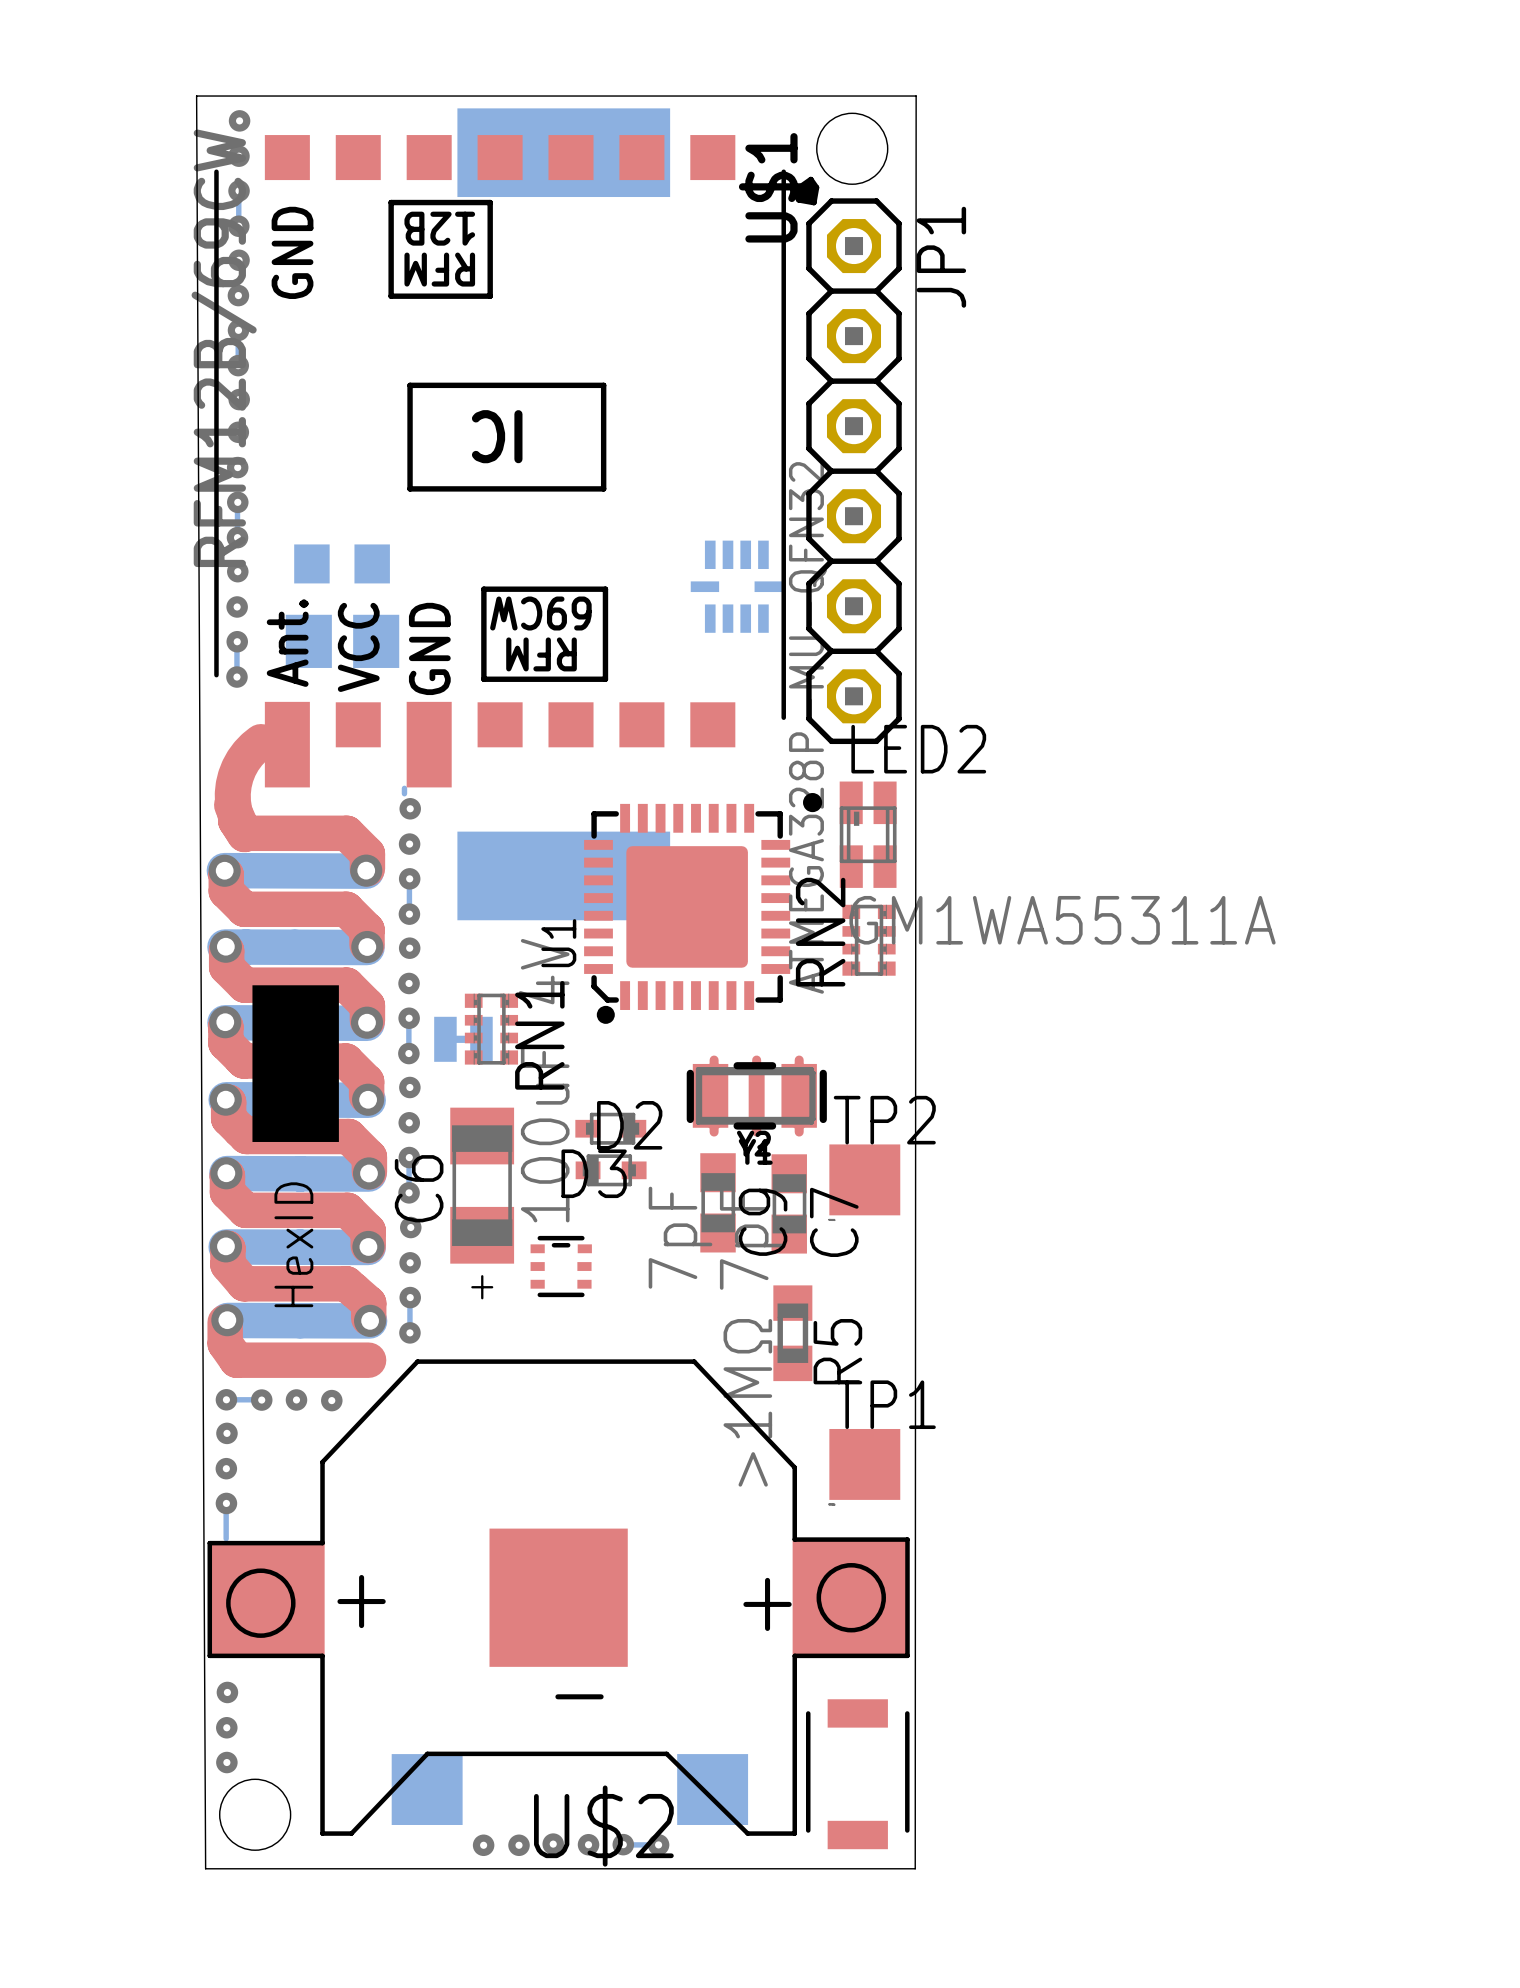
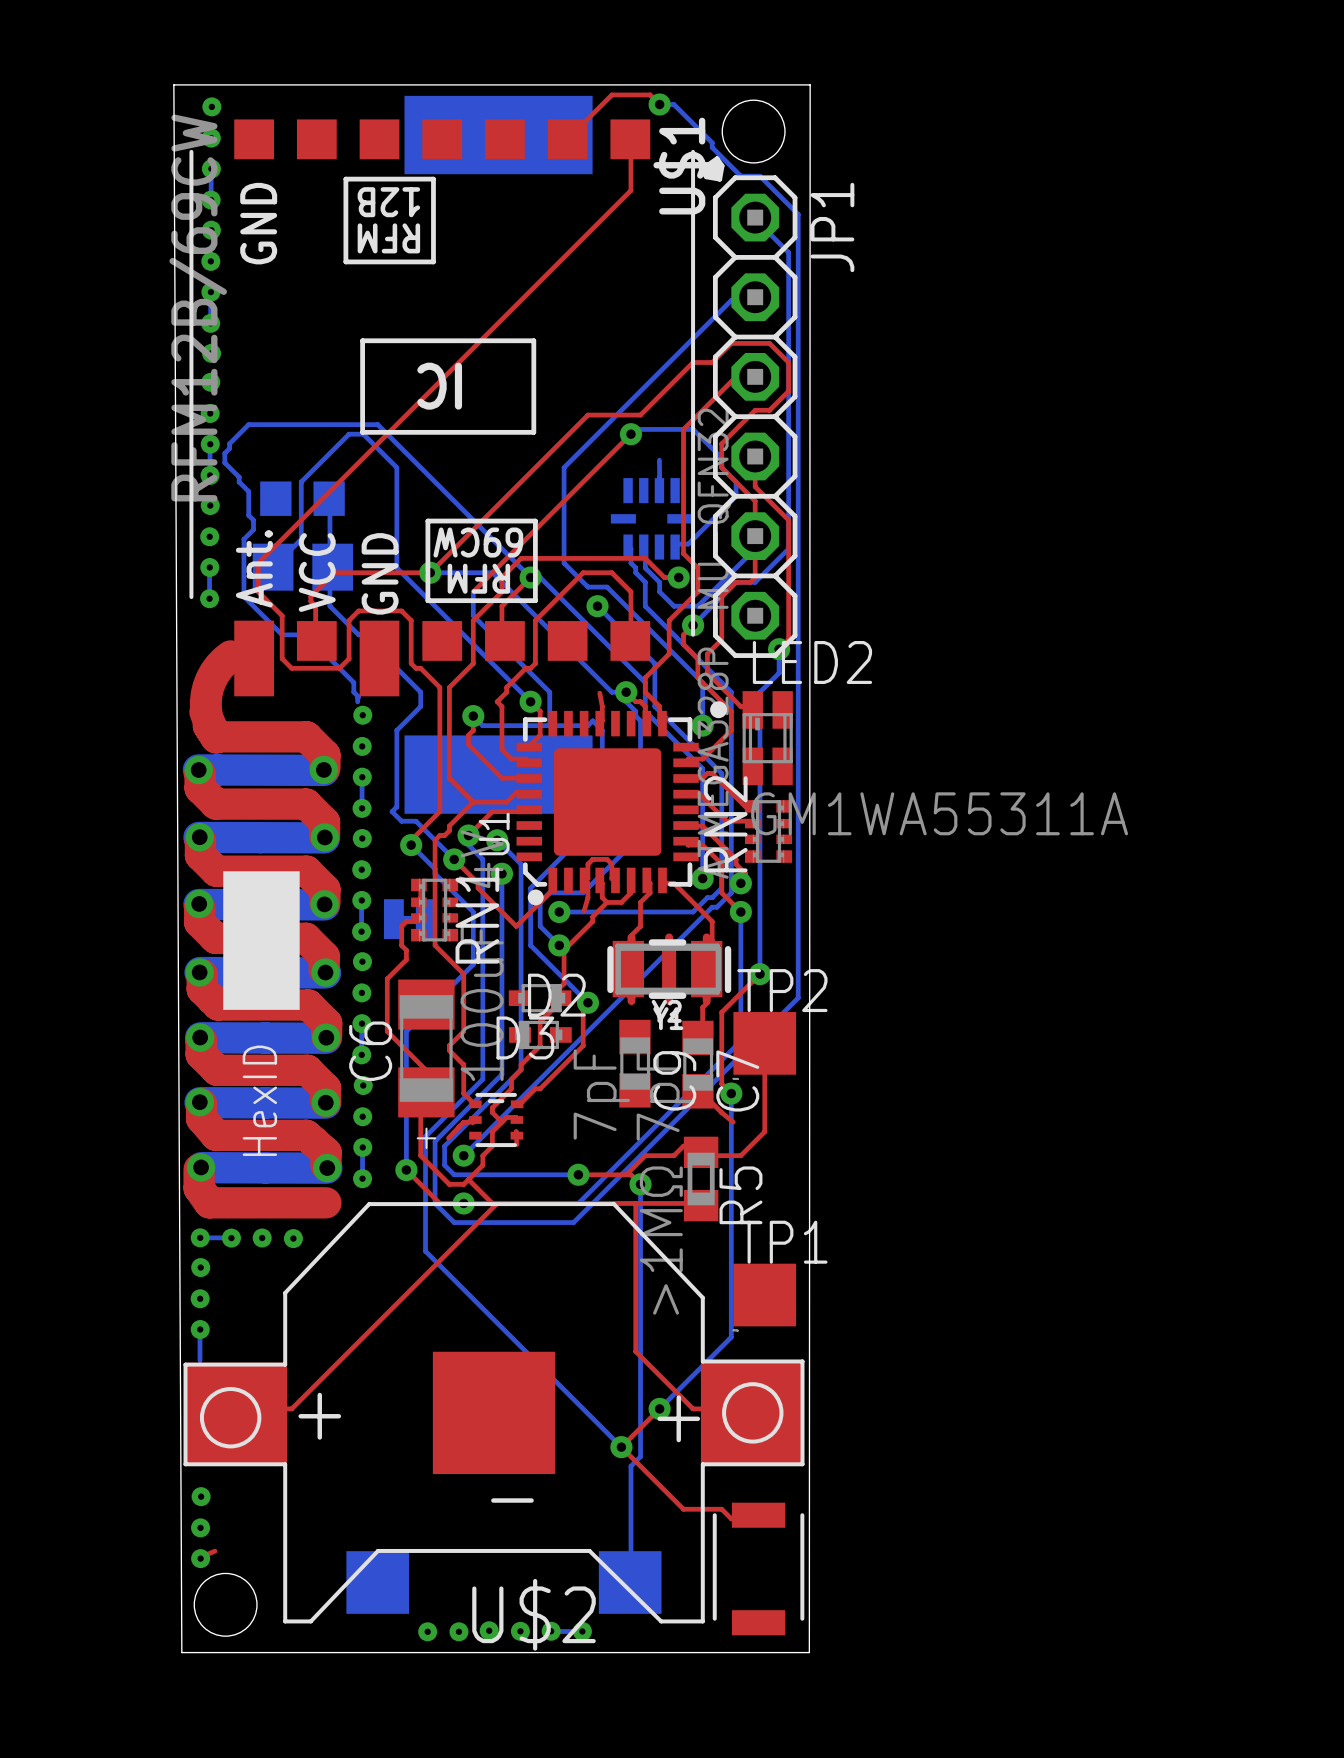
bottom track: none -> (659, 104) (673, 104) (712, 142) (712, 147) (740, 176) (759, 176) (798, 214) (798, 997) (573, 1222) (454, 1222) (435, 1203) (435, 1141) (501, 1074) (501, 873)
top track: none -> (659, 104) (650, 94) (611, 94) (567, 139)
via: none -> (659, 104)
top track: none -> (630, 139) (630, 190) (258, 563) (258, 591) (282, 615) (282, 658) (291, 668) (339, 668) (349, 658) (349, 620) (358, 610) (401, 610) (411, 620) (411, 663) (415, 668) (420, 668) (439, 687) (439, 811) (411, 840) (411, 845)
bottom track: none -> (755, 217) (788, 252) (788, 548) (755, 582) (736, 582) (693, 625)
bottom track: none -> (755, 297) (755, 300) (731, 300) (564, 467) (564, 563) (587, 587) (607, 587) (702, 682) (702, 725)
top track: none -> (755, 376) (736, 376) (683, 429) (683, 553) (697, 567) (697, 591) (669, 620) (669, 653) (645, 677) (645, 692) (659, 706) (659, 720) (662, 723)
bottom track: none -> (630, 434) (635, 429) (693, 429) (721, 458) (721, 467) (736, 481) (736, 496) (688, 544) (678, 544) (675, 547)
top track: none -> (630, 434) (473, 591)
via: none -> (630, 434)
top track: none -> (755, 456) (755, 486) (788, 520) (788, 639) (779, 649)
bottom track: none -> (659, 460) (659, 490)
bottom track: none -> (329, 498) (329, 563) (332, 567) (329, 567) (329, 606) (358, 634) (363, 634) (420, 692) (420, 706) (396, 730) (396, 806) (392, 811) (401, 821) (415, 821) (454, 859)
bottom track: none -> (755, 536) (755, 548) (697, 606) (673, 606) (659, 591) (659, 582) (645, 567) (643, 547)
bottom track: none -> (628, 547) (630, 548) (630, 563) (635, 567) (635, 572) (645, 582) (645, 606) (731, 692) (731, 892) (716, 907) (712, 907) (463, 1155)
bottom track: none -> (273, 567) (301, 539) (301, 481) (349, 434) (363, 434) (396, 467) (396, 567) (530, 701)
bottom track: none -> (430, 572) (492, 572) (611, 692) (626, 692) (626, 701) (635, 711) (635, 716) (640, 720) (640, 835) (583, 892) (549, 892) (540, 902) (540, 926) (559, 945)
via: none -> (430, 572)
top track: none -> (530, 577) (501, 606) (501, 639) (504, 640)
via: none -> (530, 577)
top track: none -> (678, 577) (664, 577) (645, 558) (521, 558) (501, 577) (501, 591) (473, 620) (473, 663) (449, 687) (449, 778) (473, 802)
via: none -> (678, 577)
bottom track: none -> (473, 591) (473, 615) (549, 692) (549, 725)
bottom track: none -> (597, 606) (654, 663) (654, 706) (721, 773) (721, 888) (712, 897) (707, 897) (693, 911) (559, 911)
via: none -> (597, 606)
top track: none -> (693, 625) (683, 634) (683, 644) (697, 658) (697, 677) (731, 711) (731, 730) (702, 759) (688, 759) (686, 762)
via: none -> (693, 625)
top track: none -> (316, 640) (315, 606) (310, 601) (310, 596) (334, 572) (430, 572) (587, 415) (640, 415) (693, 362) (712, 362) (731, 343) (769, 343) (788, 362) (788, 391) (769, 410) (755, 410) (721, 443) (721, 467) (755, 501) (755, 577) (750, 582) (736, 582) (721, 596) (721, 639) (707, 653) (707, 673) (740, 706) (750, 706) (752, 709)
top track: none -> (630, 640) (630, 591) (611, 572) (583, 572) (535, 620) (535, 663) (530, 668) (525, 668) (506, 687) (506, 692) (497, 701) (501, 706) (501, 749) (511, 759) (525, 759) (529, 762)
bottom track: none -> (779, 649) (779, 673) (759, 692) (759, 974)
via: none -> (779, 649)
top track: none -> (626, 692) (635, 701) (640, 701) (645, 706) (646, 723)
via: none -> (626, 692)
top track: none -> (599, 693) (602, 720) (599, 723)
bottom track: none -> (357, 697) (353, 692) (353, 682) (306, 634) (282, 634) (243, 596) (243, 539) (253, 529) (253, 520) (248, 515) (248, 491) (239, 481) (239, 477) (224, 462) (224, 453) (229, 448) (229, 443) (248, 424) (377, 424) (530, 577) (540, 577) (645, 682) (645, 711) (702, 768) (702, 878)
top track: none -> (530, 701) (540, 711) (540, 735) (529, 747)
via: none -> (530, 701)
bottom track: none -> (473, 716) (482, 725) (587, 725) (592, 720) (602, 730) (602, 806) (607, 811) (530, 888) (530, 945) (587, 1002)
top track: none -> (473, 716) (473, 730) (468, 735) (468, 744) (501, 778) (529, 778)
via: none -> (473, 716)
via: none -> (702, 725)
top track: none -> (686, 778) (702, 778) (707, 773) (712, 773) (745, 806) (752, 806)
top track: none -> (529, 794) (516, 792) (506, 802) (473, 802)
top track: none -> (686, 794) (697, 792) (726, 821) (750, 821) (752, 823)
top track: none -> (473, 802) (449, 825) (449, 830) (444, 835) (439, 835) (435, 840) (435, 945) (463, 974) (463, 1031) (449, 1045) (449, 1050) (463, 1064) (463, 1093) (475, 1104)
top track: none -> (529, 809) (525, 811) (492, 811) (468, 835)
top track: none -> (686, 825) (702, 825) (736, 859) (736, 864) (745, 873) (740, 878) (740, 883)
bottom track: none -> (468, 835) (468, 845) (482, 859) (482, 1079) (425, 1136) (425, 1251) (621, 1447)
via: none -> (468, 835)
bottom track: none -> (497, 840) (521, 864) (521, 1069) (444, 1146) (444, 1165) (454, 1174) (578, 1174)
via: none -> (497, 840)
top track: none -> (686, 841) (688, 845) (702, 845) (721, 864) (721, 892) (740, 911)
bottom track: none -> (411, 845) (435, 868) (435, 873) (473, 911) (473, 964) (406, 1031) (406, 1170)
via: none -> (411, 845)
top track: none -> (454, 859) (478, 883) (478, 888) (516, 926) (554, 888) (552, 880)
via: none -> (454, 859)
via: none -> (501, 873)
via: none -> (702, 878)
top track: none -> (599, 880) (602, 883) (602, 897) (607, 902)
top track: none -> (615, 880) (611, 878) (611, 864) (607, 859) (592, 859) (587, 864) (587, 878) (584, 880) (587, 883) (587, 897) (584, 910)
top track: none -> (631, 880) (630, 892) (621, 902) (607, 902)
top track: none -> (646, 880) (650, 883) (650, 892) (640, 902) (640, 926) (630, 935) (631, 969)
top track: none -> (662, 880) (664, 883) (673, 883) (712, 921) (712, 940) (707, 945) (706, 969)
via: none -> (740, 883)
top track: none -> (418, 885) (420, 888) (418, 902) (420, 902) (420, 916) (415, 921) (406, 921) (401, 926) (401, 945) (406, 950) (406, 959) (387, 978) (387, 1031) (425, 1069) (426, 1092) (420, 1098) (420, 1155) (449, 1184) (463, 1184) (482, 1165) (482, 1155) (492, 1146) (492, 1131) (506, 1117) (516, 1117) (516, 1119)
top track: none -> (607, 902) (592, 916) (592, 921) (564, 950)
via: none -> (559, 911)
bottom track: none -> (740, 911) (740, 1041) (578, 1203) (463, 1203)
via: none -> (740, 911)
via: none -> (559, 945)
top track: none -> (564, 950) (564, 983) (559, 988) (560, 998) (559, 1002) (540, 1021) (540, 1045) (521, 1064) (521, 1069) (511, 1079) (511, 1088) (492, 1107) (492, 1112) (501, 1122)
top track: none -> (759, 974) (721, 1012) (721, 1084) (731, 1093)
via: none -> (759, 974)
top track: none -> (706, 1001) (702, 1007) (702, 1036) (697, 1038)
top track: none -> (587, 1002) (583, 1007) (583, 1045) (540, 1088) (535, 1088) (521, 1103) (517, 1104)
via: none -> (587, 1002)
top track: none -> (764, 1043) (764, 1131) (740, 1155) (702, 1155) (693, 1146) (683, 1146) (673, 1155) (645, 1155) (626, 1174)
top track: none -> (697, 1091) (733, 1122)
bottom track: none -> (731, 1093) (731, 1337) (659, 1408)
via: none -> (731, 1093)
top track: none -> (475, 1119) (473, 1122) (463, 1122) (448, 1138)
top track: none -> (516, 1135) (516, 1131) (516, 1144)
via: none -> (463, 1155)
top track: none -> (406, 1170) (439, 1203) (463, 1203)
via: none -> (406, 1170)
top track: none -> (578, 1174) (630, 1174) (640, 1184)
via: none -> (578, 1174)
top track: none -> (468, 1179) (492, 1203) (697, 1203) (701, 1205)
bottom track: none -> (640, 1184) (640, 1456) (630, 1466) (630, 1582)
via: none -> (640, 1184)
via: none -> (463, 1203)
top track: none -> (497, 1203) (291, 1408) (239, 1408) (236, 1412)
top track: none -> (635, 1203) (635, 1351) (693, 1408) (750, 1408) (751, 1412)
top track: none -> (659, 1408) (621, 1447) (683, 1509) (721, 1509) (731, 1518) (755, 1518) (758, 1515)
via: none -> (659, 1408)
via: none -> (621, 1447)
top track: none -> (214, 1551) (200, 1558)

